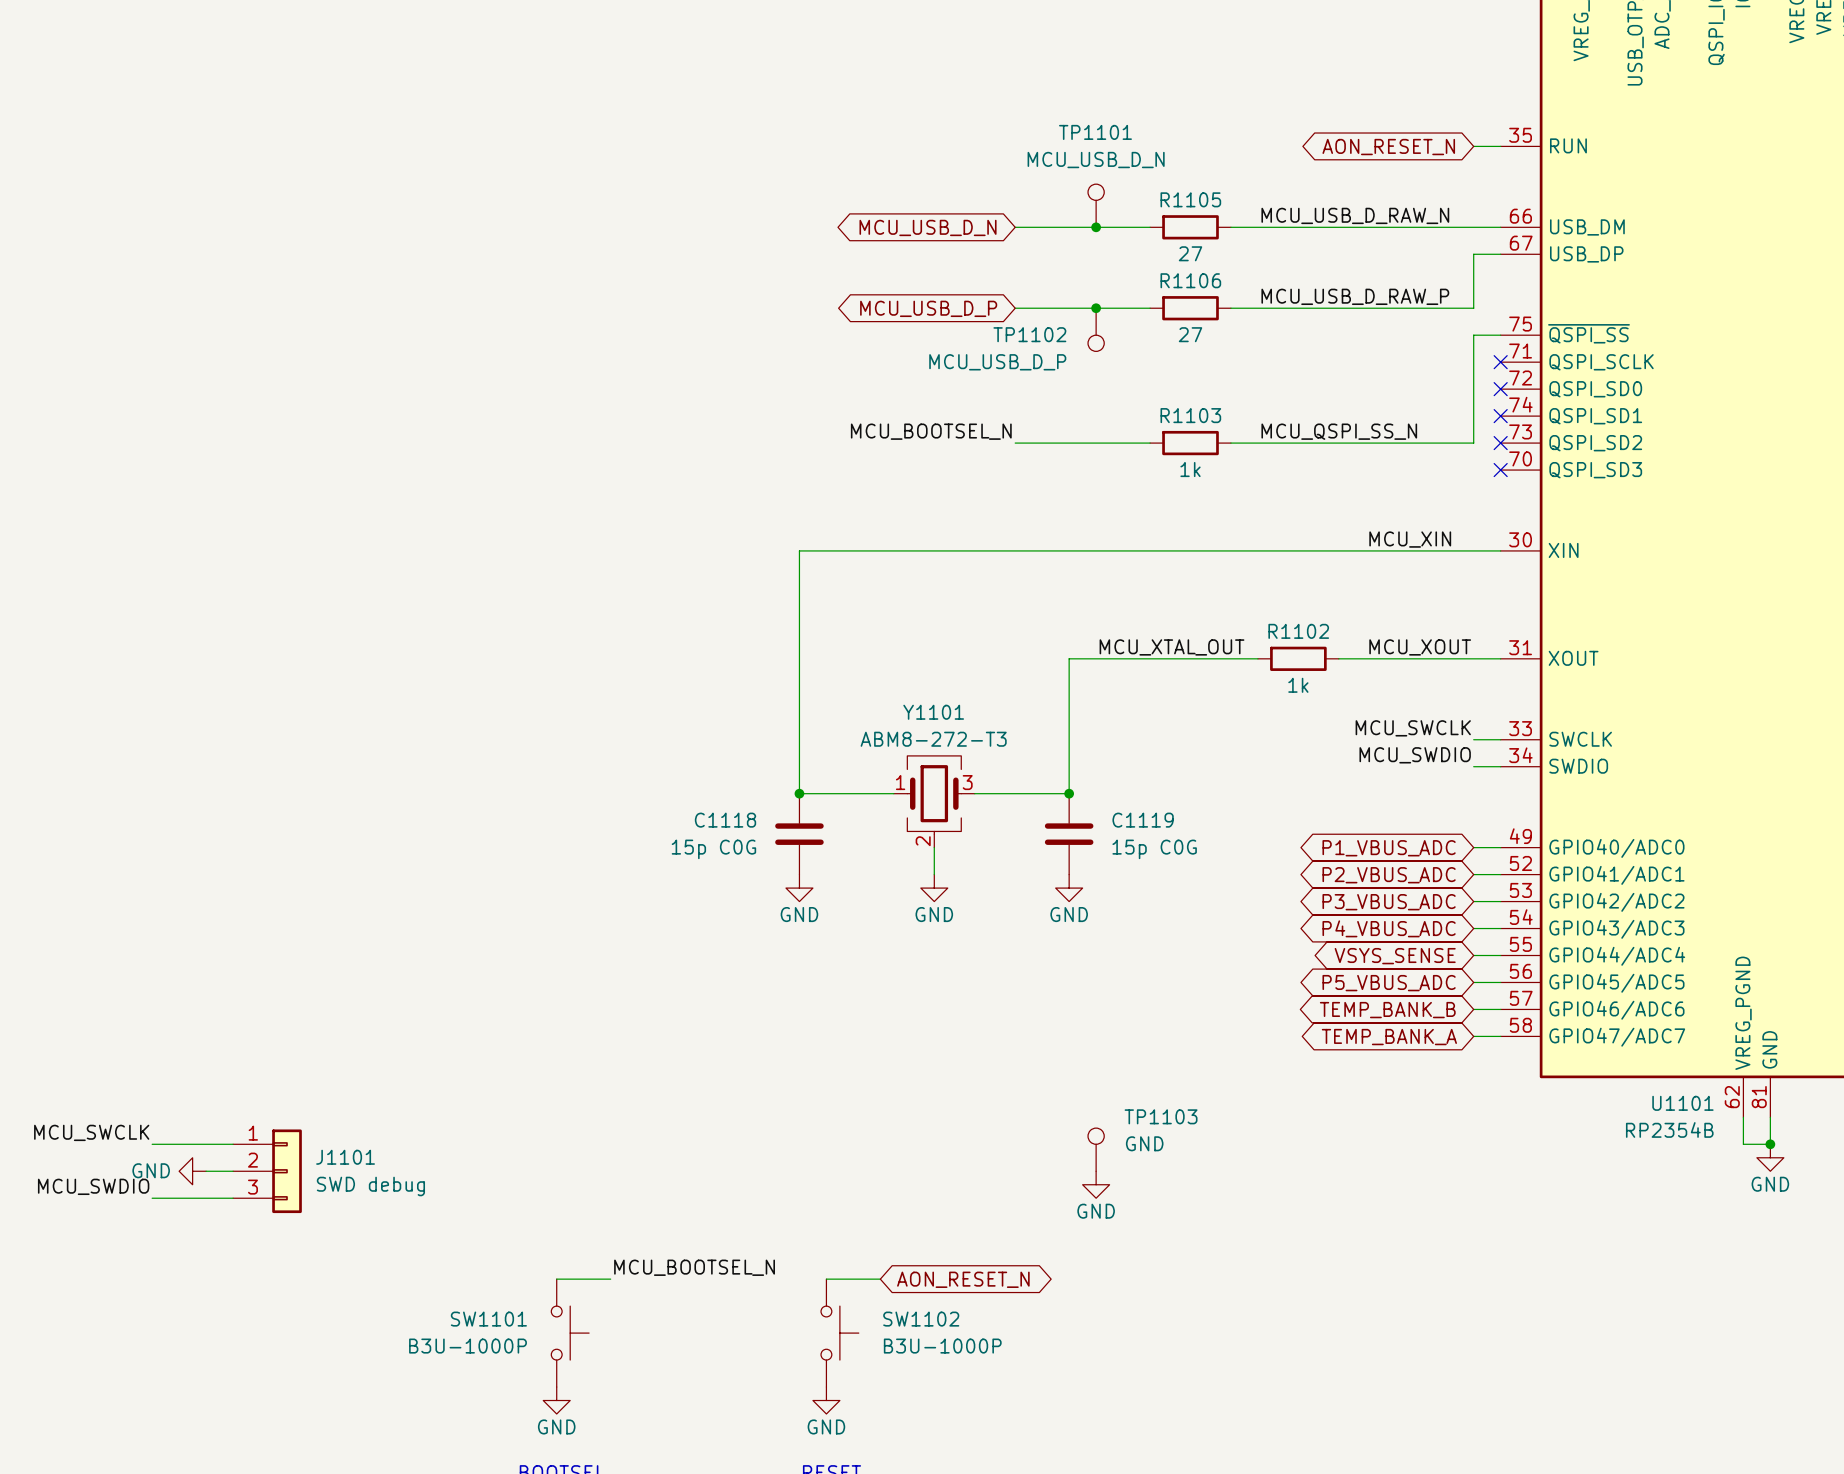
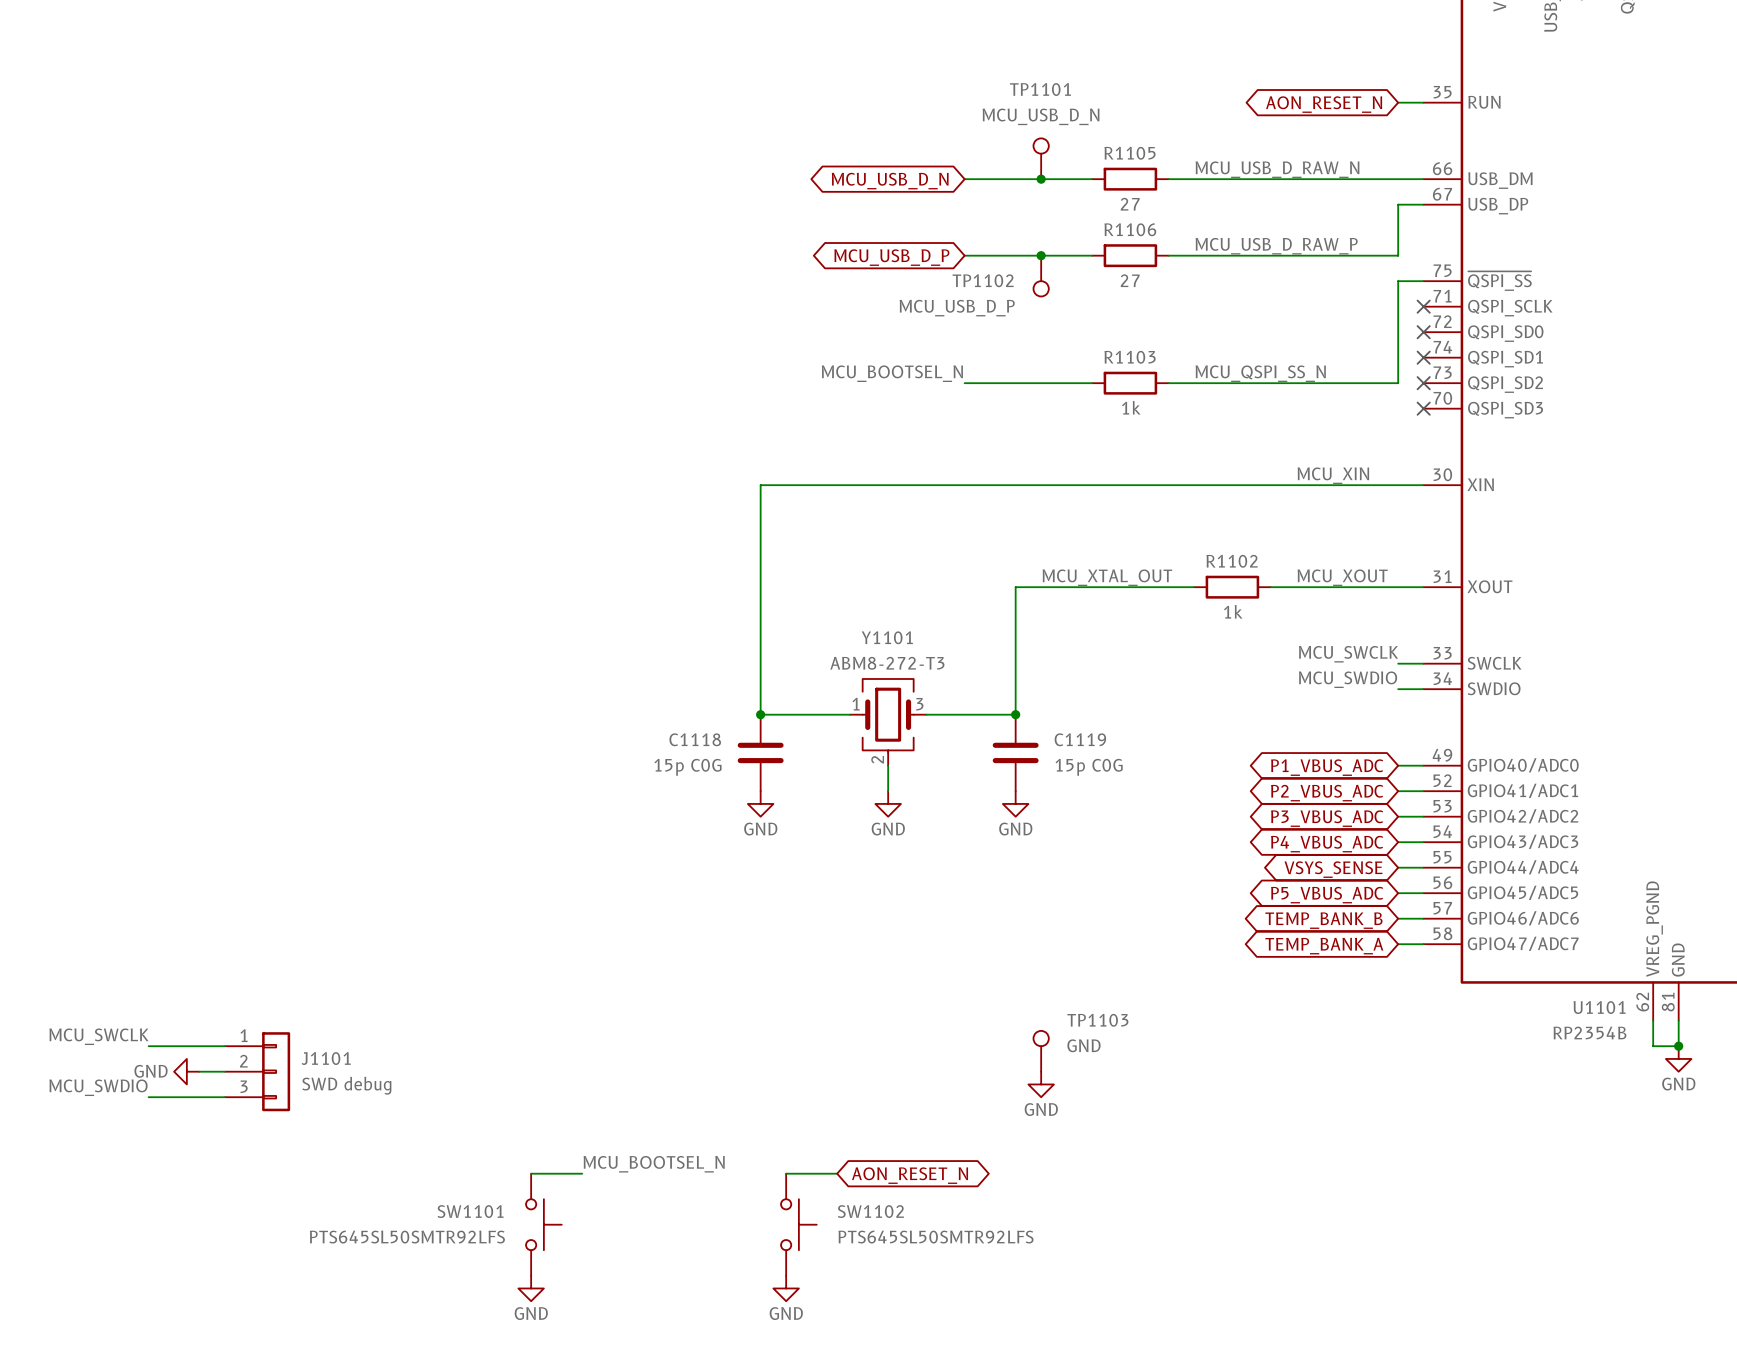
SW1101 value: B3U-1000P (468, 1346) -> PTS645SL50SMTR92LFS (407, 1237)
SW1102 value: B3U-1000P (942, 1346) -> PTS645SL50SMTR92LFS (935, 1237)

